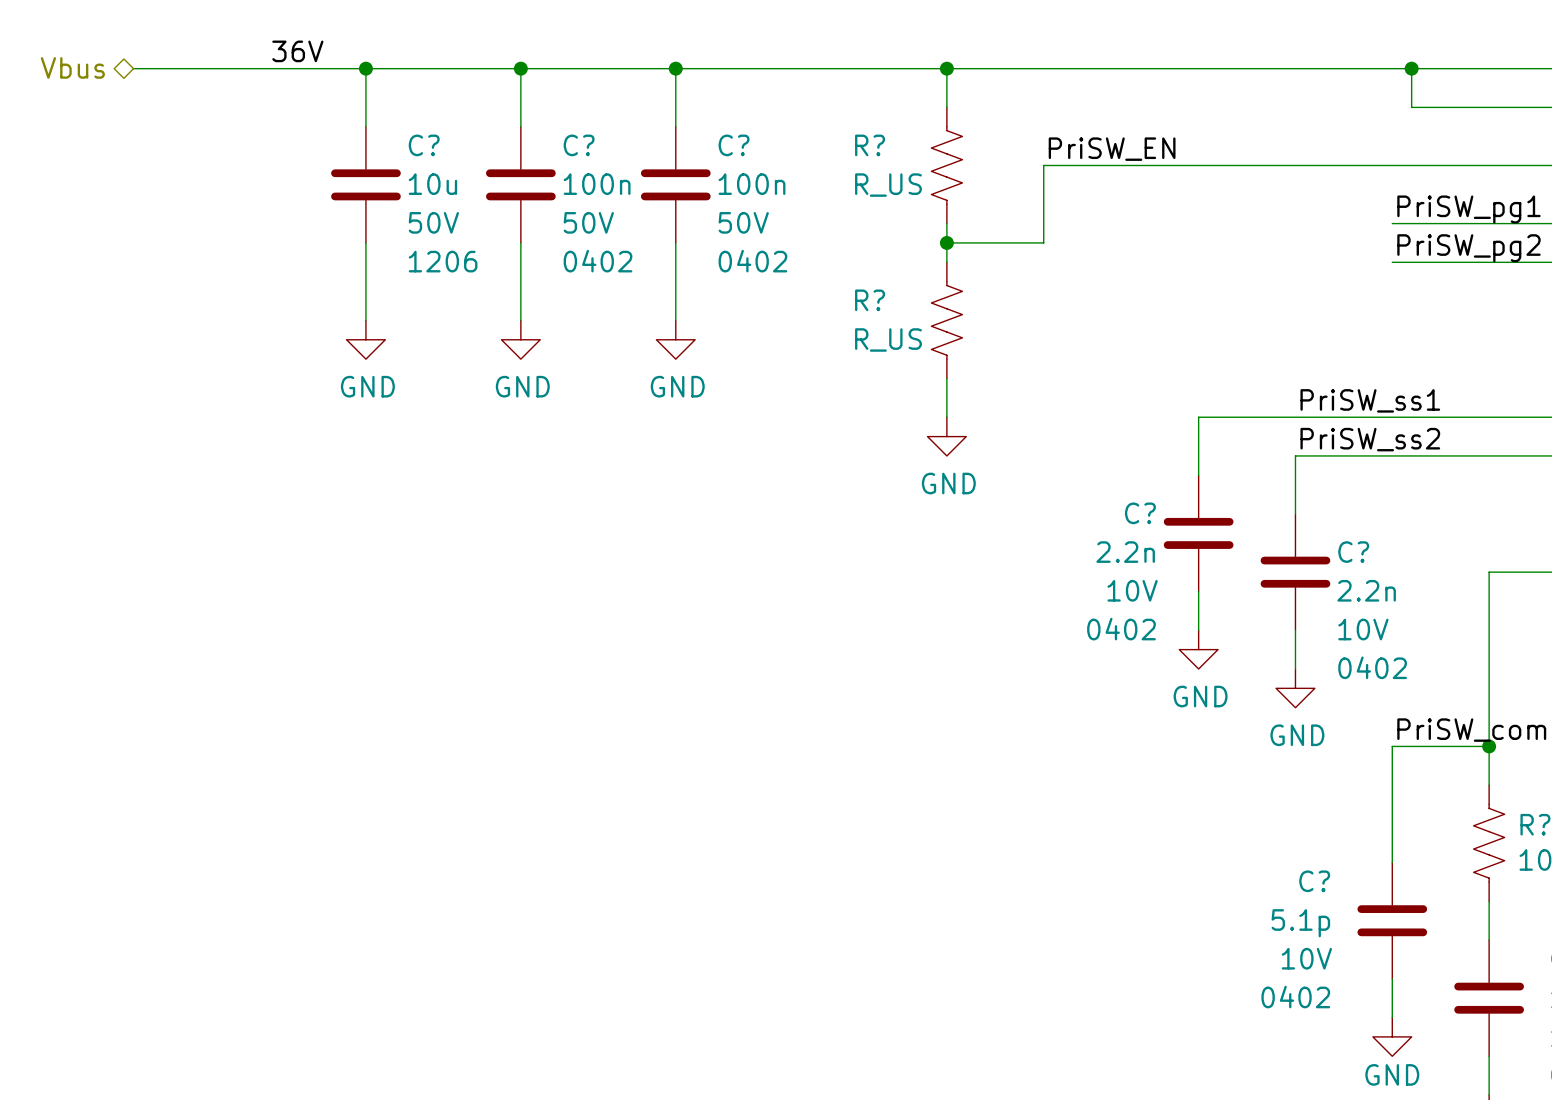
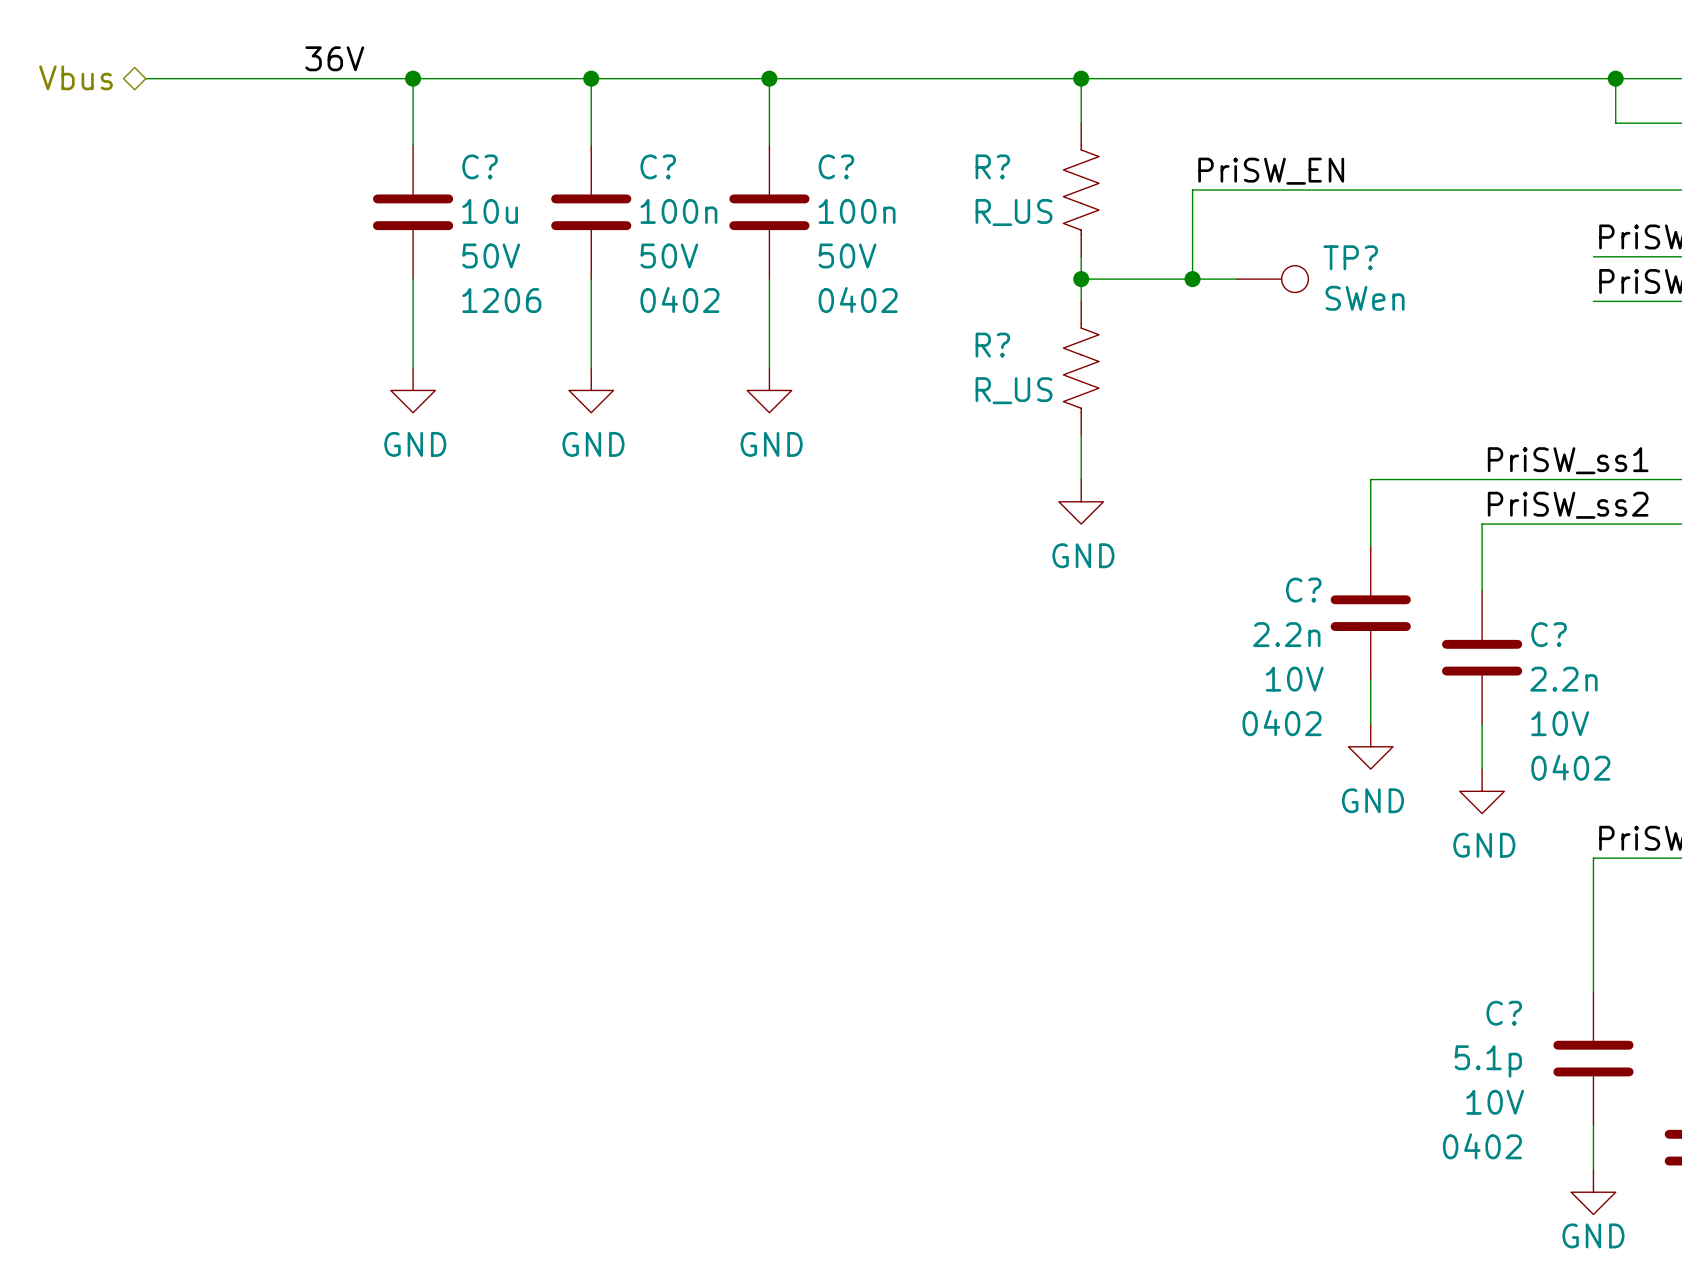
wire: none -> (1192, 279) (1237, 279)
junction: none -> (1192, 279)
TP?: none -> SWen (1272, 279)

